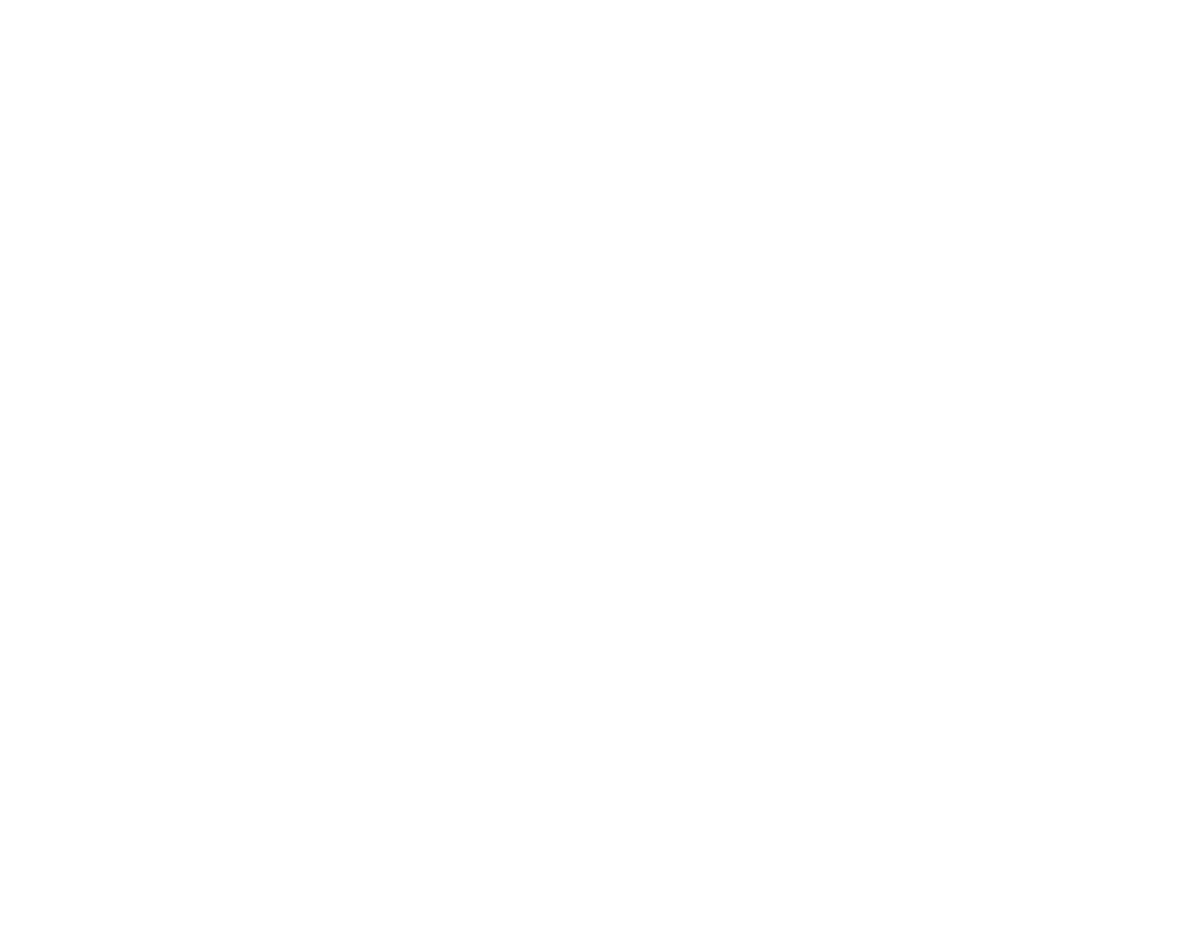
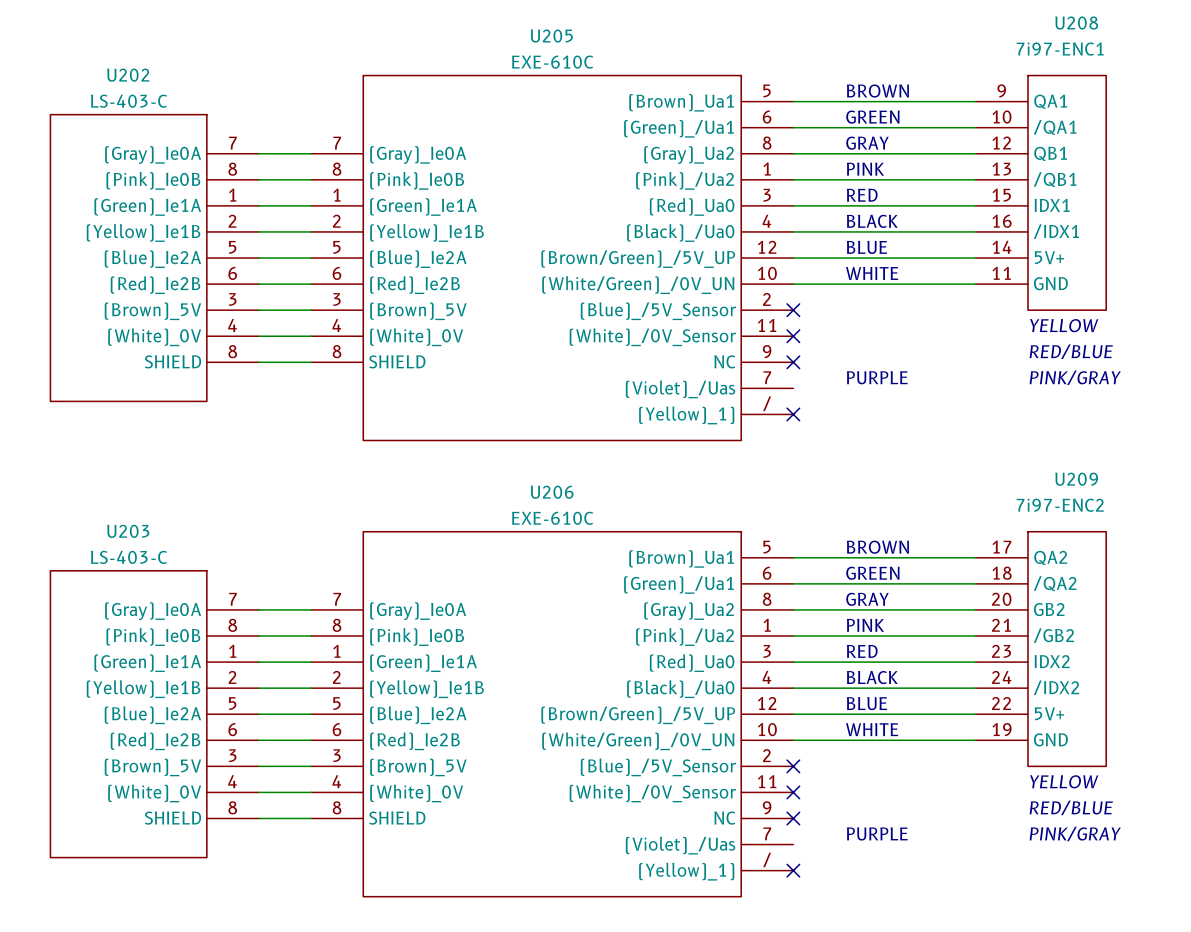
text: none -> BROWN (877, 91)
wire: none -> (793, 101) (975, 101)
text: none -> GREEN (872, 117)
wire: none -> (793, 127) (975, 127)
text: none -> GRAY (867, 143)
wire: none -> (258, 153) (311, 153)
wire: none -> (793, 153) (975, 153)
text: none -> PINK (865, 169)
wire: none -> (258, 179) (311, 179)
wire: none -> (793, 179) (975, 179)
U208: none -> 7i97-ENC1 (1041, 192)
text: none -> RED (862, 195)
wire: none -> (258, 205) (311, 205)
wire: none -> (793, 205) (975, 205)
text: none -> BLACK (872, 221)
wire: none -> (258, 231) (311, 231)
wire: none -> (793, 231) (975, 231)
text: none -> BLUE (866, 247)
U202: none -> LS-403-C (154, 258)
wire: none -> (258, 258) (311, 258)
U205: none -> EXE-610C (552, 258)
wire: none -> (793, 258) (975, 258)
text: none -> WHITE (872, 273)
wire: none -> (258, 284) (311, 284)
wire: none -> (793, 284) (975, 284)
wire: none -> (258, 310) (311, 310)
no-connect mark: none -> (793, 310)
text: none -> YELLOW (1064, 325)
wire: none -> (258, 336) (311, 336)
no-connect mark: none -> (793, 336)
text: none -> RED/BLUE (1071, 351)
wire: none -> (258, 362) (311, 362)
no-connect mark: none -> (793, 362)
text: none -> PURPLE (877, 377)
text: none -> PINK/GRAY (1075, 377)
no-connect mark: none -> (793, 414)
text: none -> BROWN (877, 547)
wire: none -> (793, 557) (975, 557)
text: none -> GREEN (872, 573)
wire: none -> (793, 583) (975, 583)
text: none -> GRAY (867, 599)
wire: none -> (258, 609) (311, 609)
wire: none -> (793, 609) (975, 609)
text: none -> PINK (865, 625)
wire: none -> (258, 636) (311, 636)
wire: none -> (793, 636) (975, 636)
U209: none -> 7i97-ENC2 (1041, 649)
text: none -> RED (862, 651)
wire: none -> (258, 662) (311, 662)
wire: none -> (793, 662) (975, 662)
text: none -> BLACK (872, 677)
wire: none -> (258, 688) (311, 688)
wire: none -> (793, 688) (975, 688)
text: none -> BLUE (866, 703)
U203: none -> LS-403-C (154, 714)
wire: none -> (258, 714) (311, 714)
U206: none -> EXE-610C (552, 714)
wire: none -> (793, 714) (975, 714)
text: none -> WHITE (872, 729)
wire: none -> (258, 740) (311, 740)
wire: none -> (793, 740) (975, 740)
wire: none -> (258, 766) (311, 766)
no-connect mark: none -> (793, 766)
text: none -> YELLOW (1064, 781)
wire: none -> (258, 792) (311, 792)
no-connect mark: none -> (793, 792)
text: none -> RED/BLUE (1071, 807)
wire: none -> (258, 818) (311, 818)
no-connect mark: none -> (793, 818)
text: none -> PURPLE (877, 833)
text: none -> PINK/GRAY (1075, 833)
no-connect mark: none -> (793, 870)

